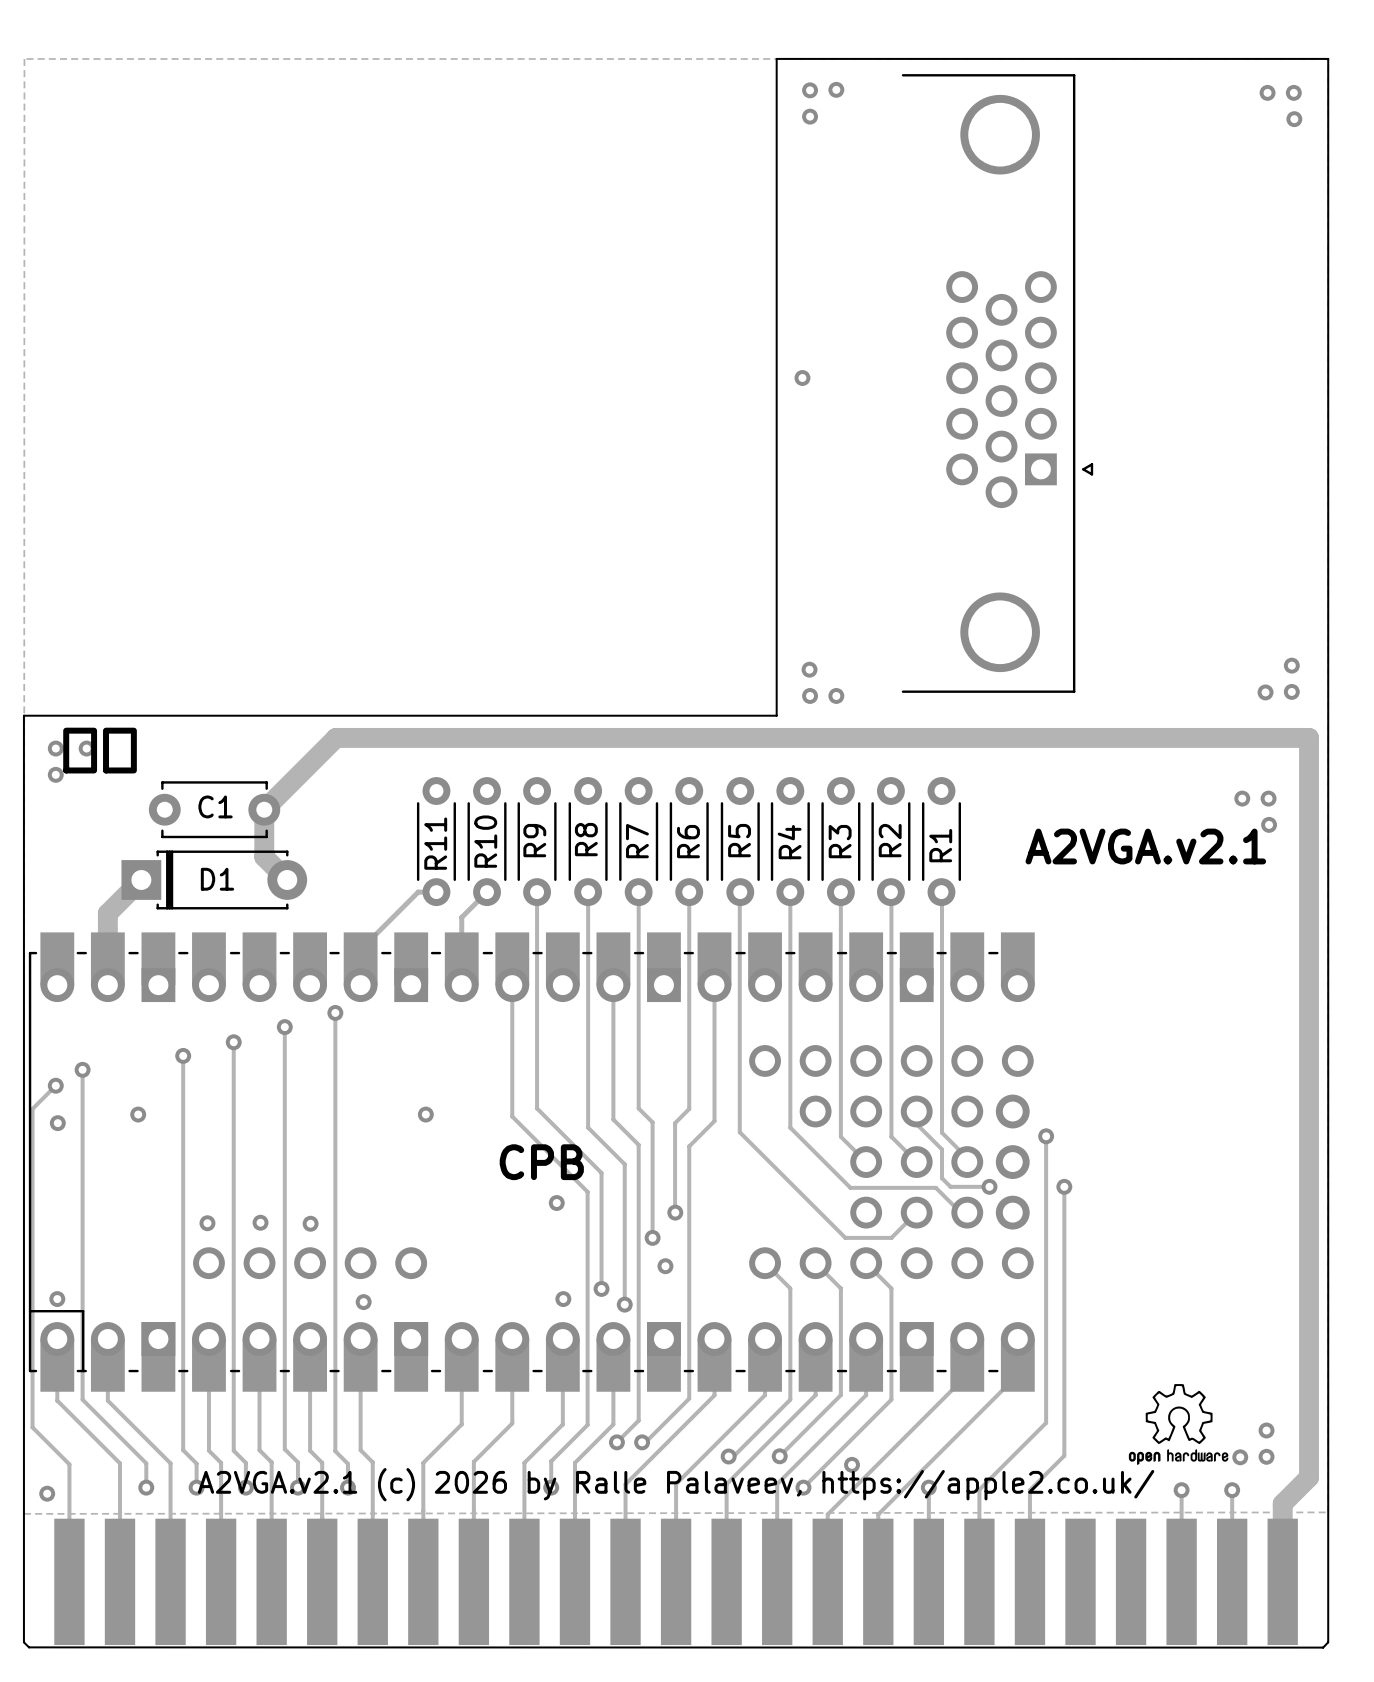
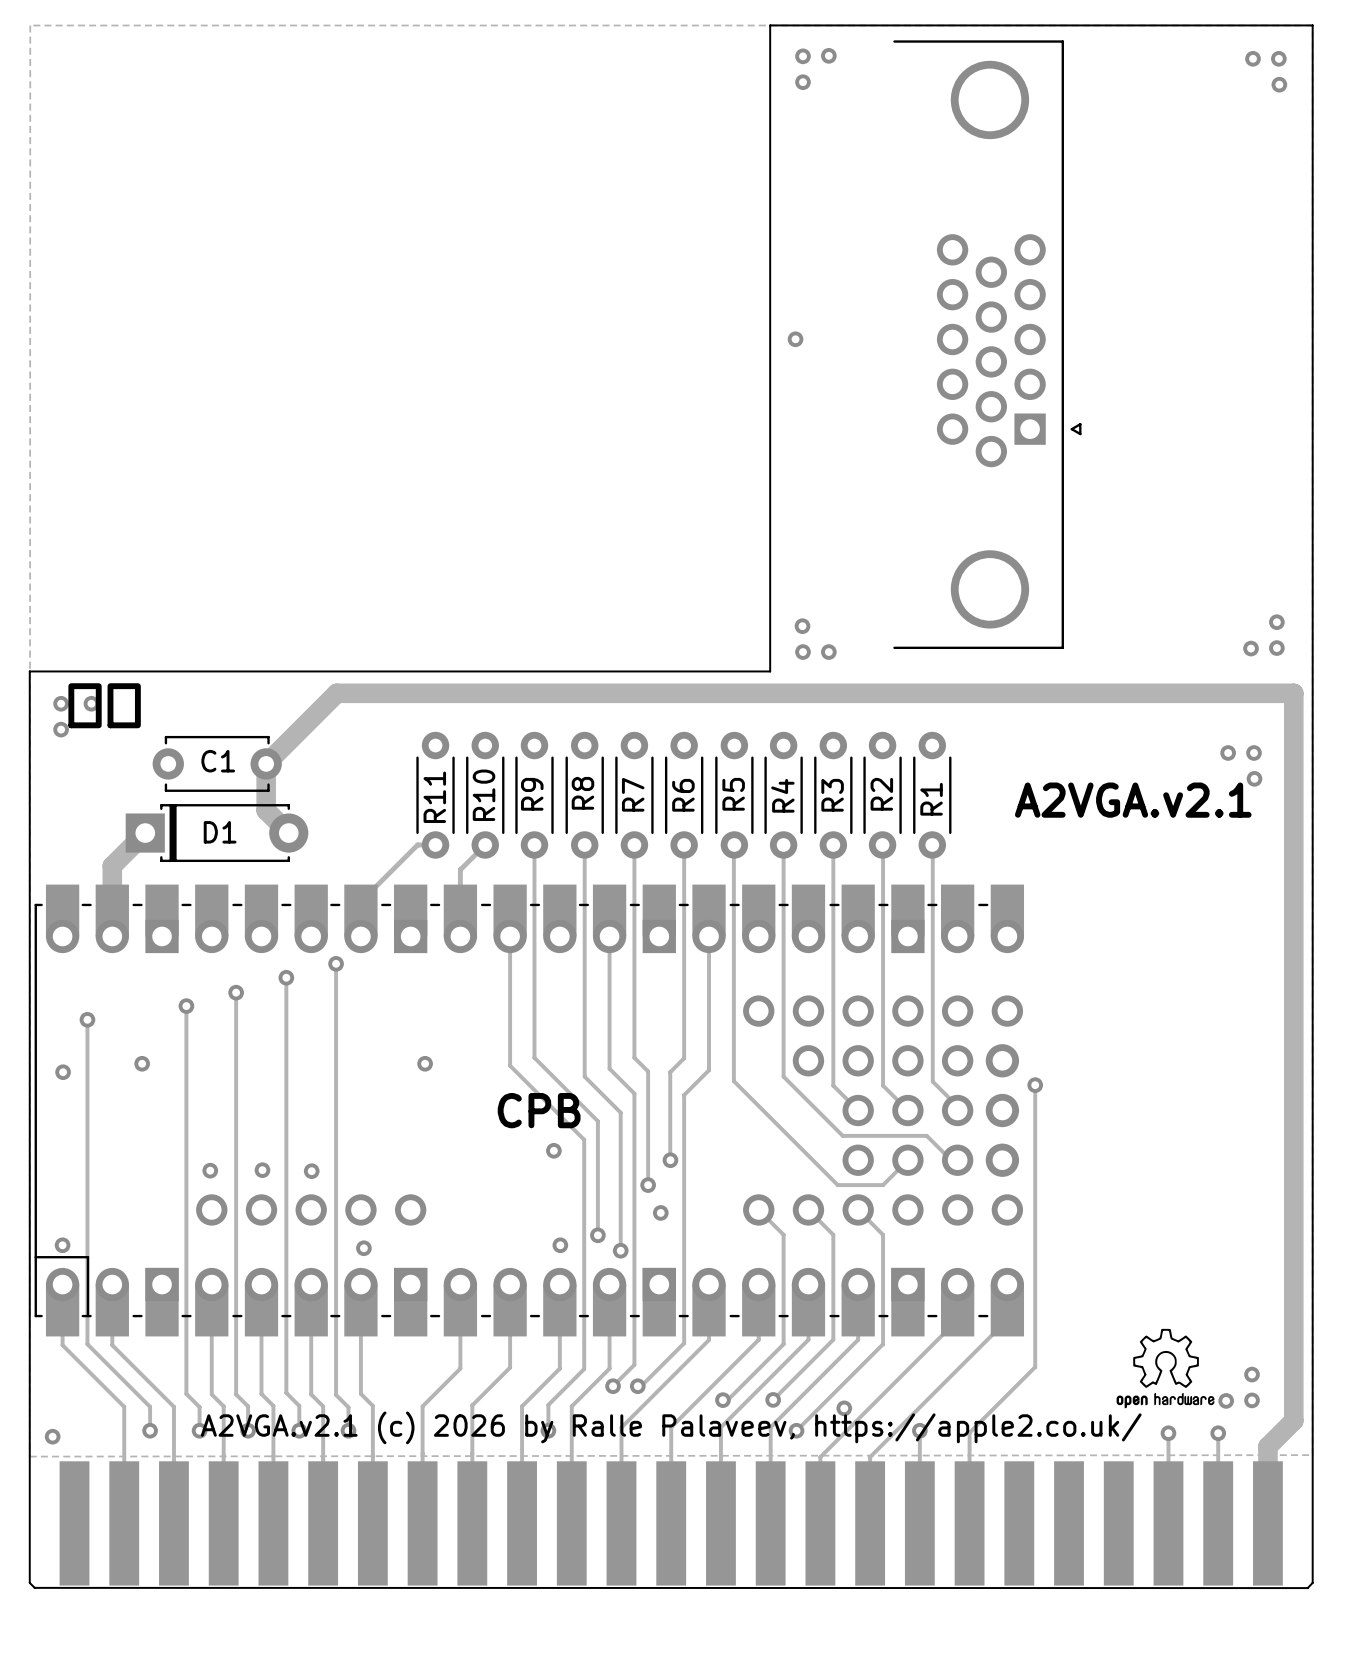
track: (55, 1085) (32, 1108) (32, 1427) (69, 1464) (69, 1581) -> none
via: (55, 1085) -> none
track: (916, 1111) (916, 1124) (941, 1149) (941, 1178) (950, 1186) (989, 1186) -> none
via: (989, 1186) -> none
track: (1064, 1186) (1064, 1455) (1029, 1490) (1029, 1581) -> none
via: (1064, 1186) -> none

